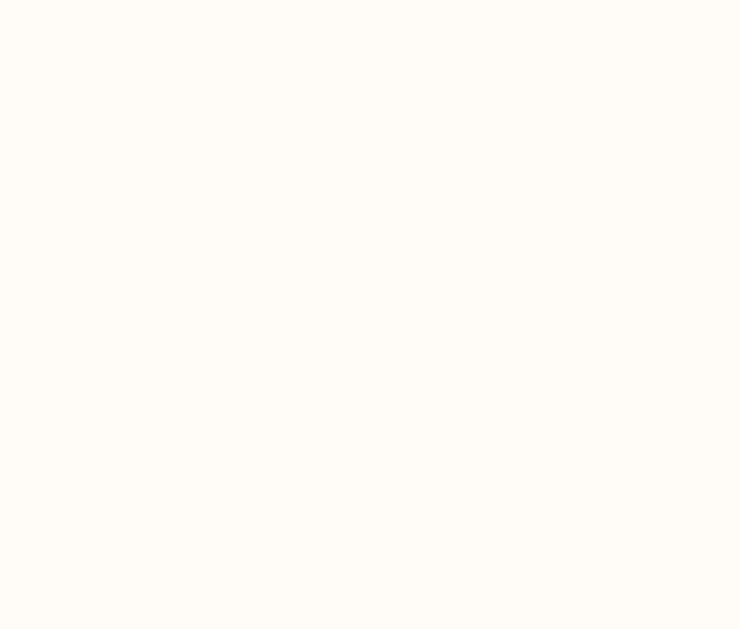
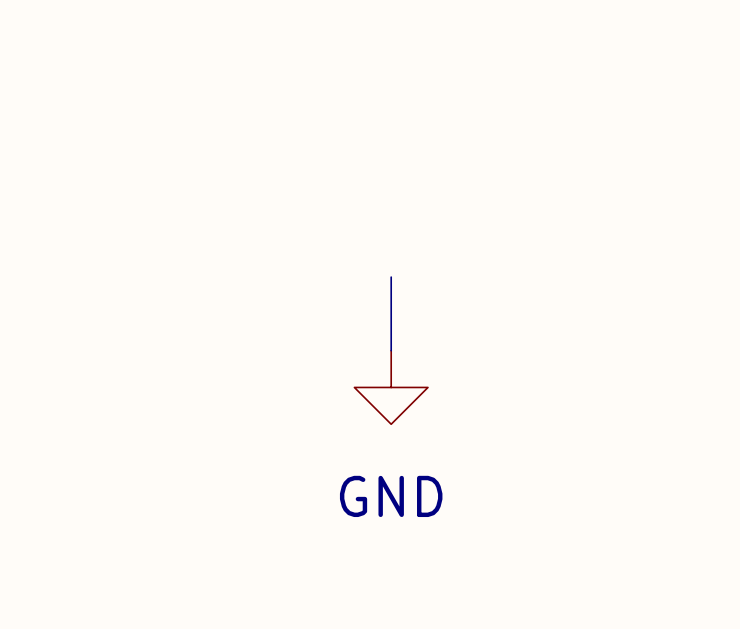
wire: none -> (391, 277) (391, 350)
power symbol: none -> GND (391, 387)

